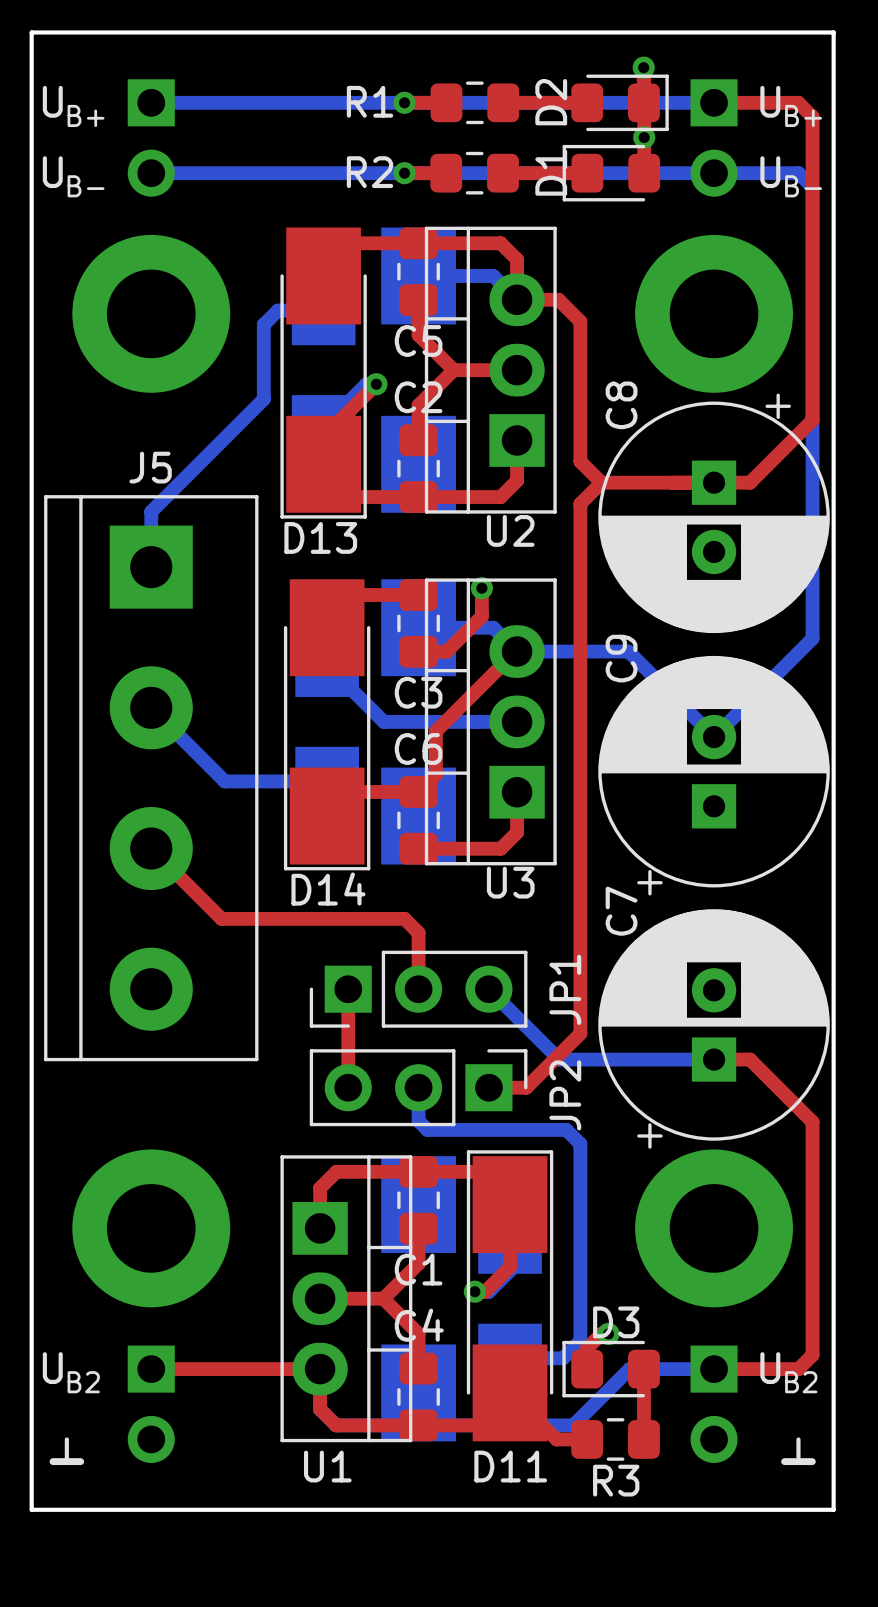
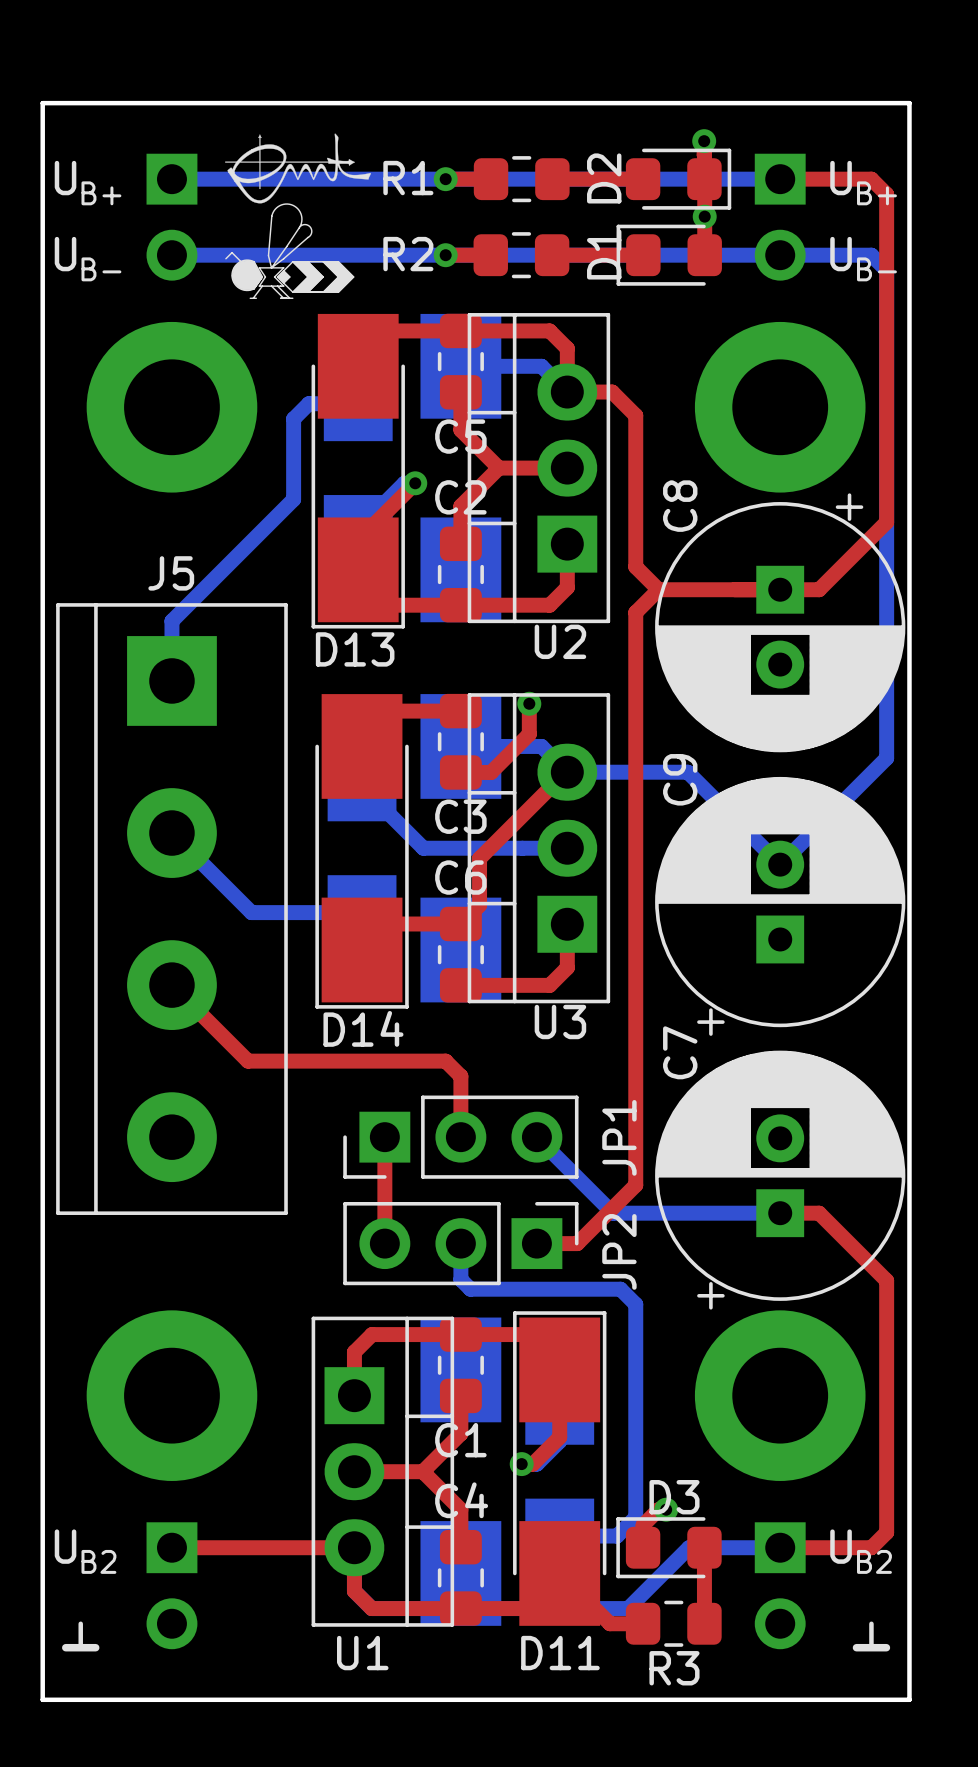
drawing: none -> [225, 133, 371, 300]

